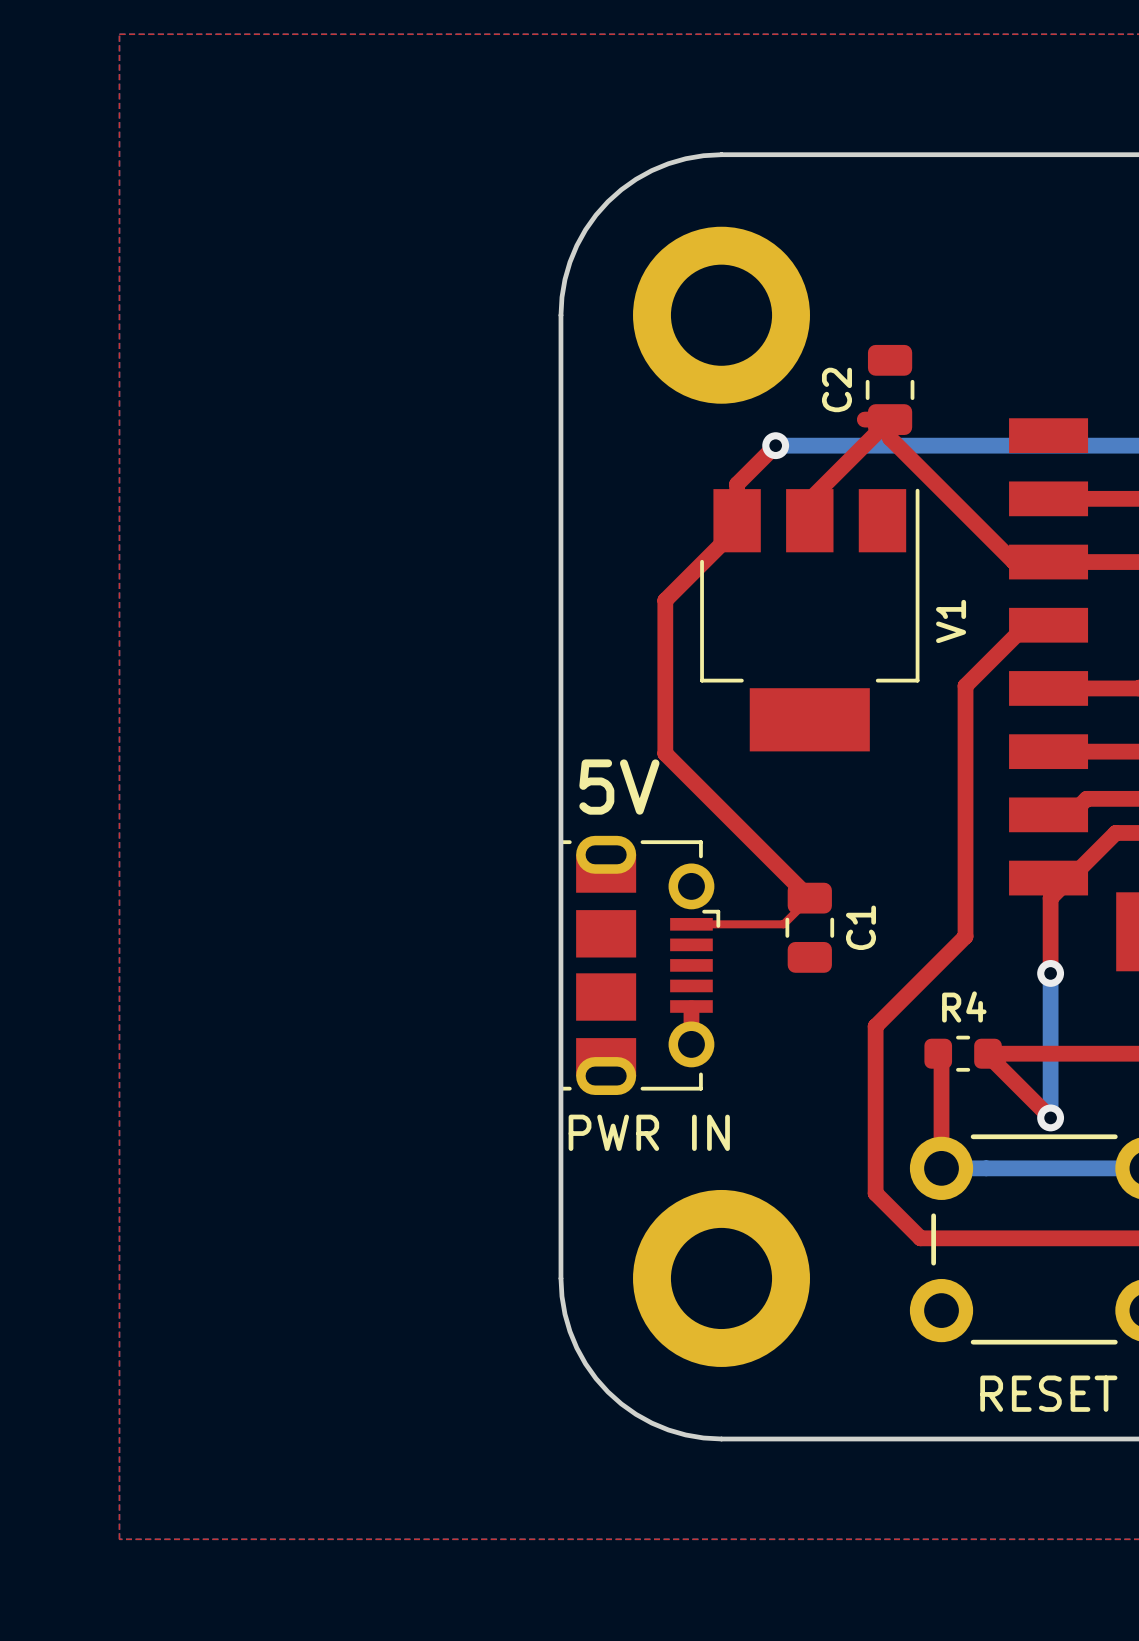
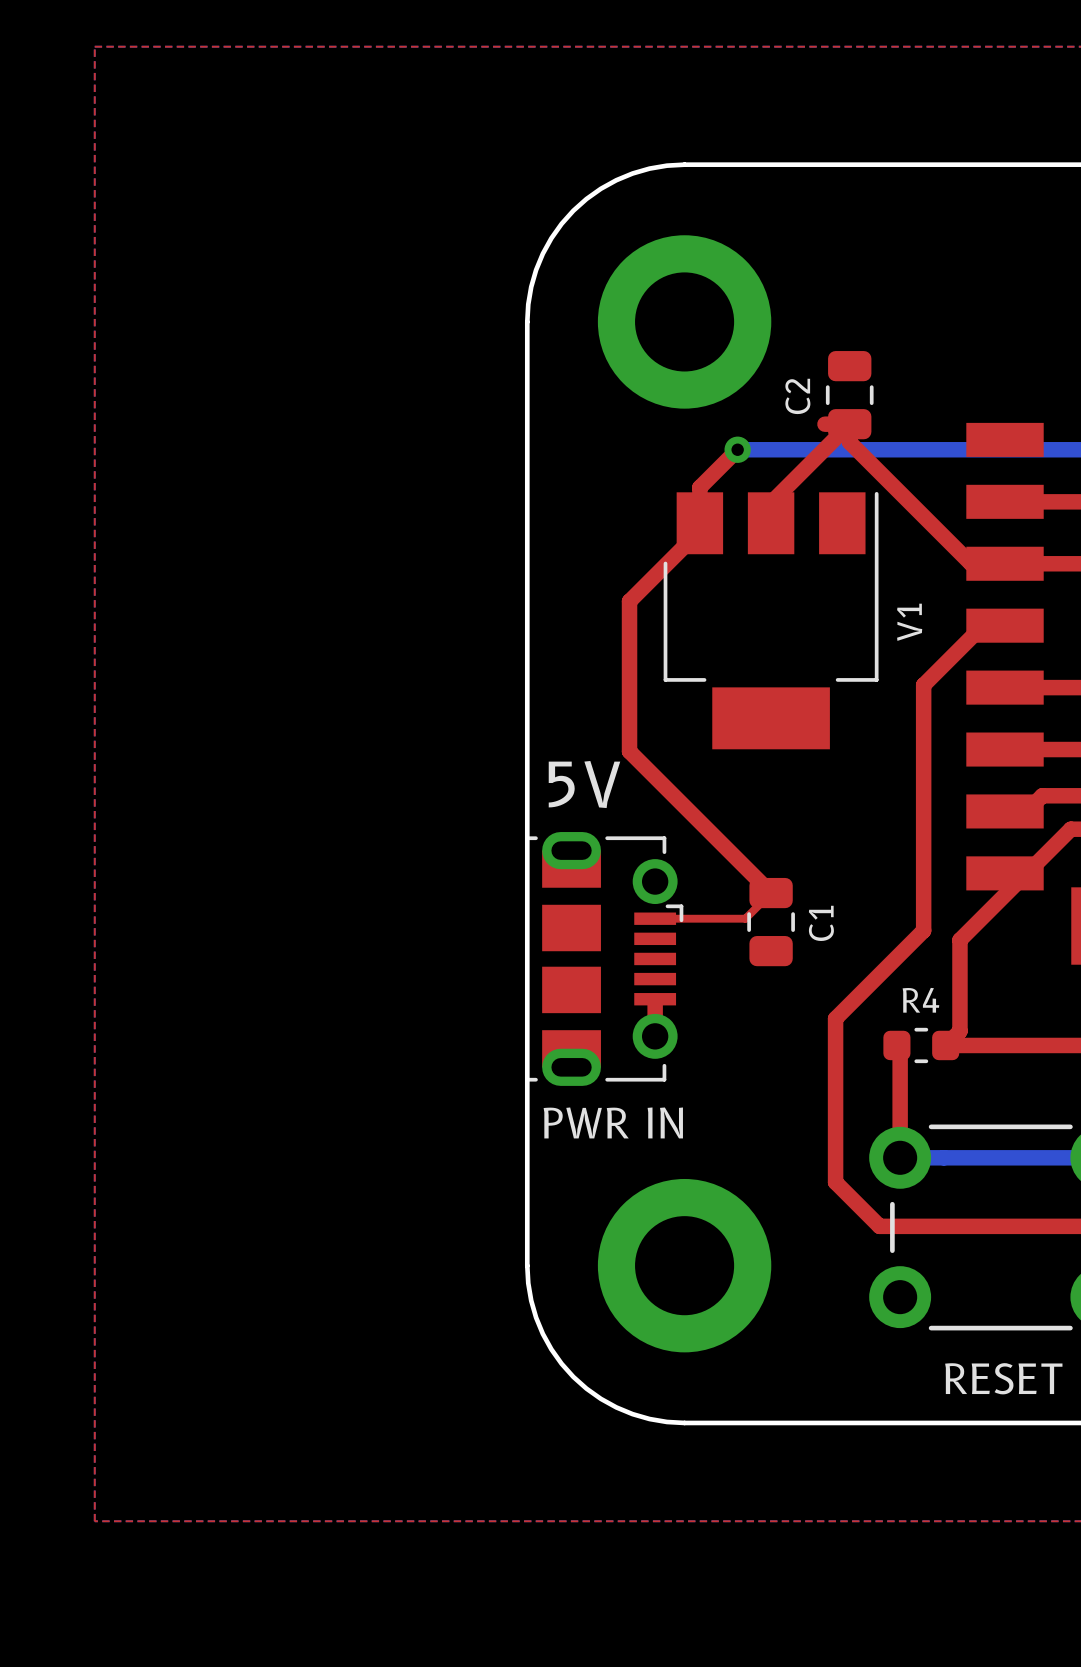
top track: (1050, 898) (1050, 973) -> (1007, 893) (959, 940) (959, 1031) (945, 1045)
bottom track: (1050, 973) (1050, 1117) -> none
via: (1050, 973) -> none
top track: (988, 1055) (1050, 1117) -> none
via: (1050, 1117) -> none

